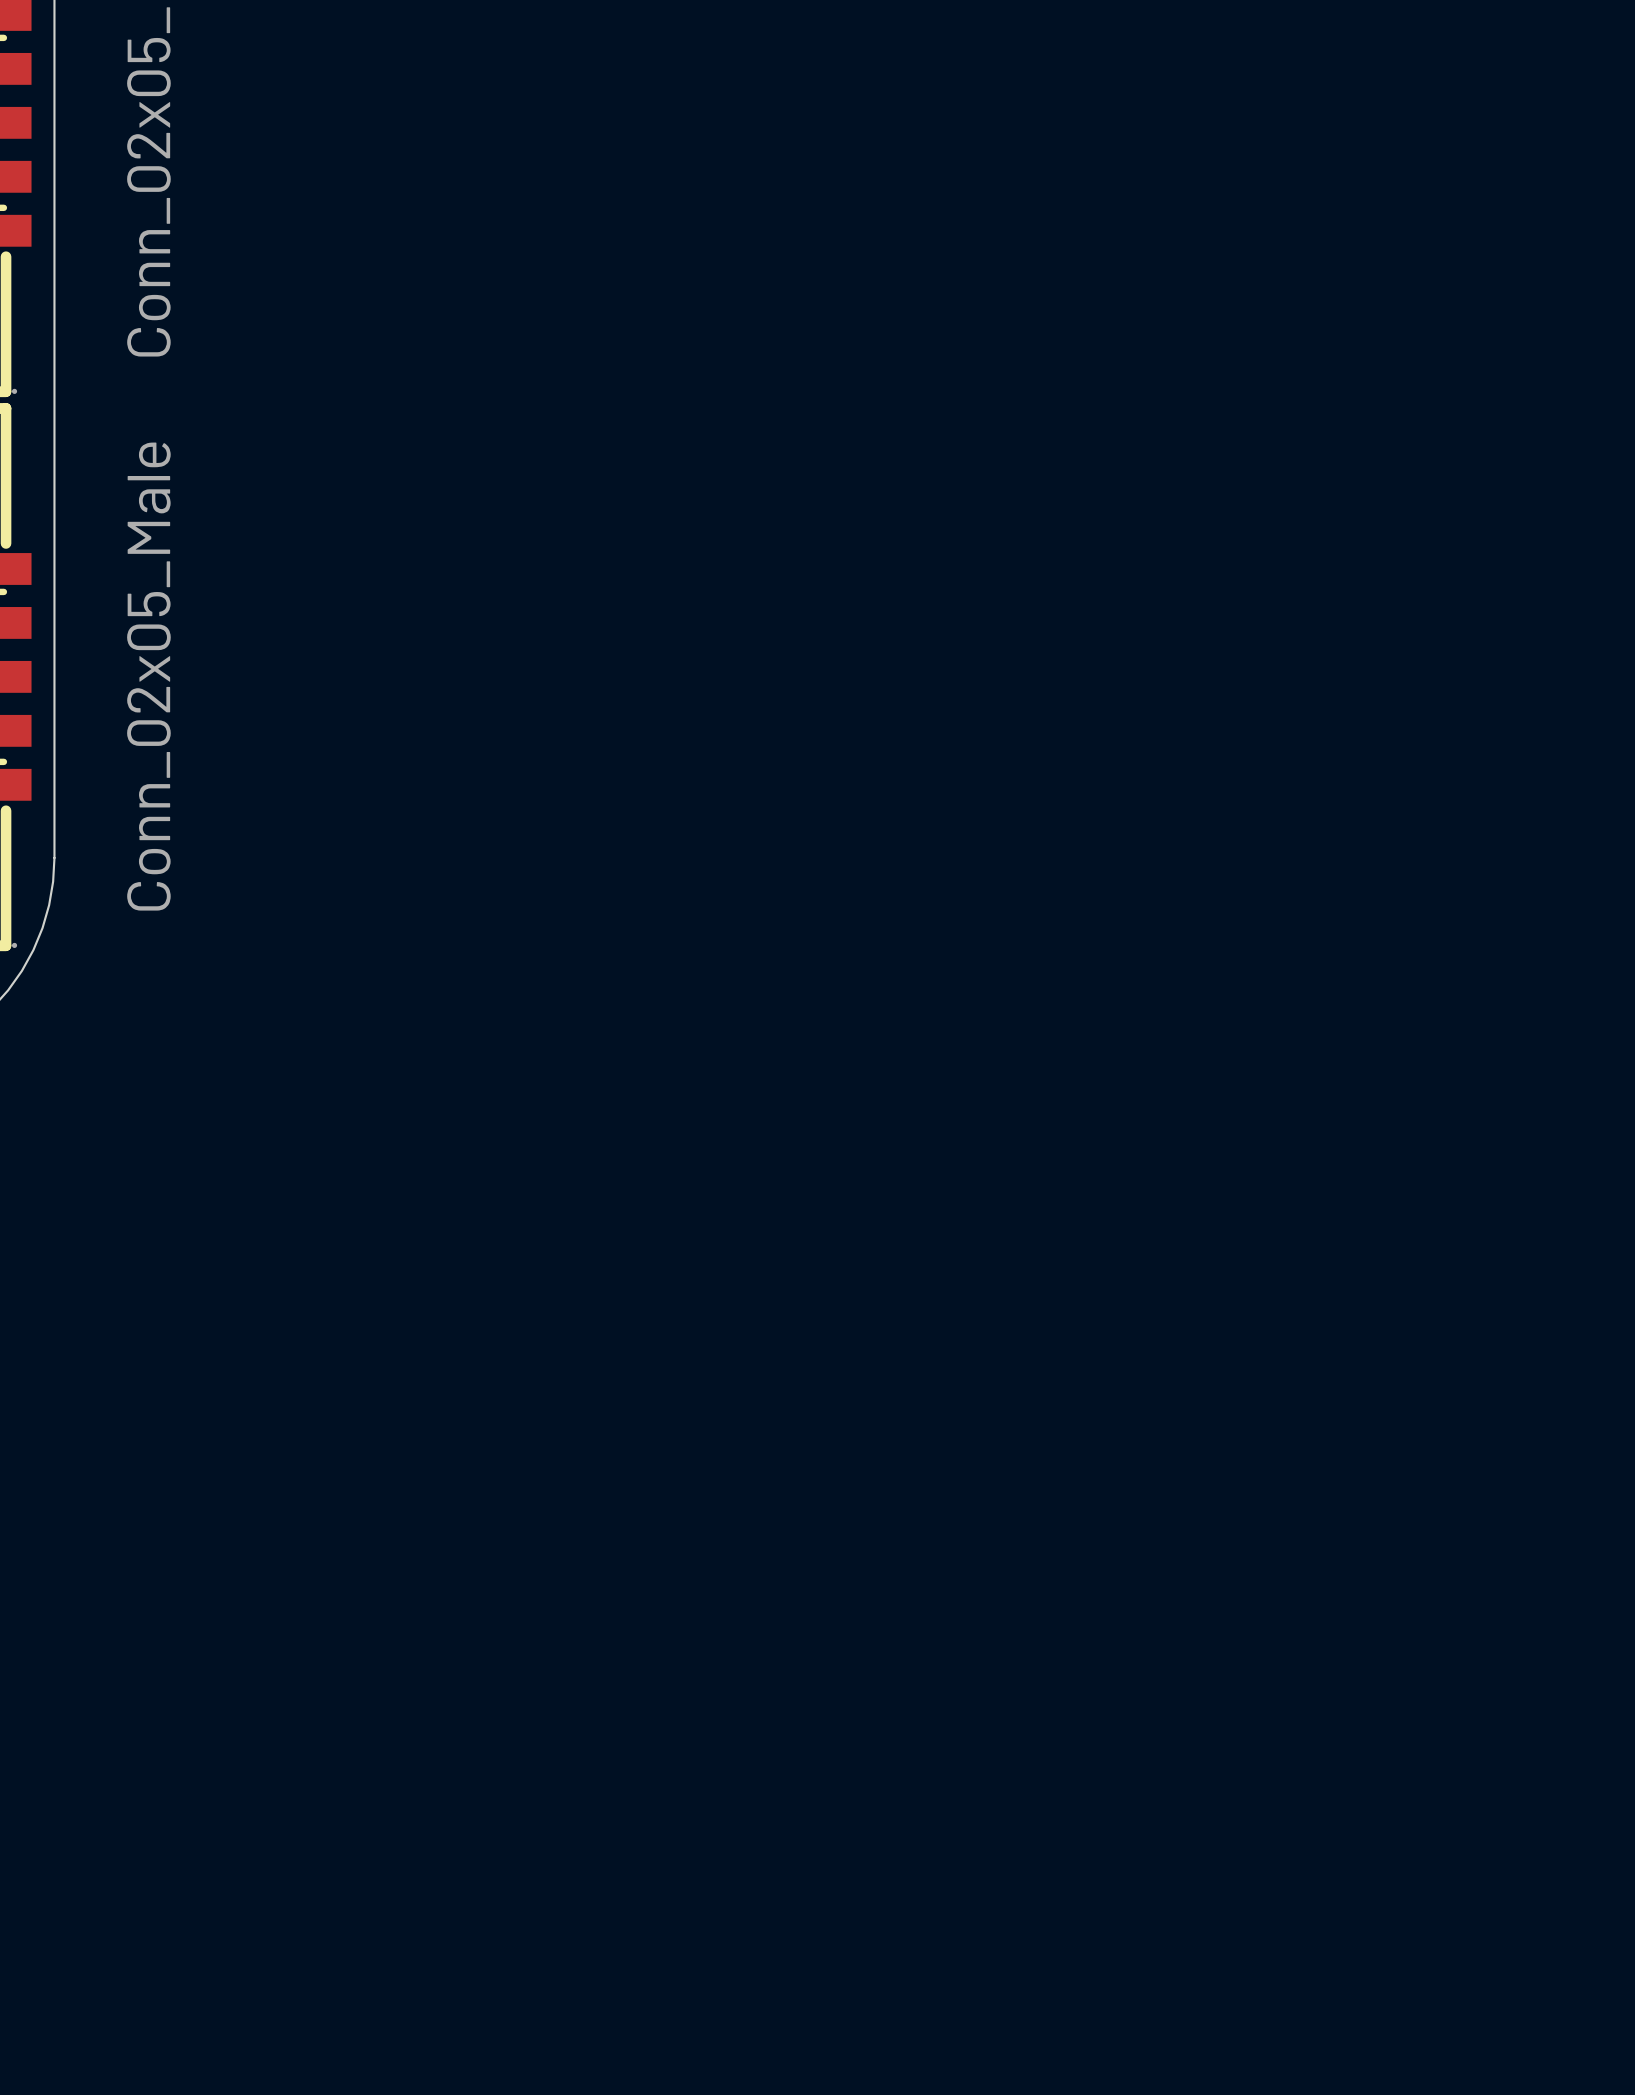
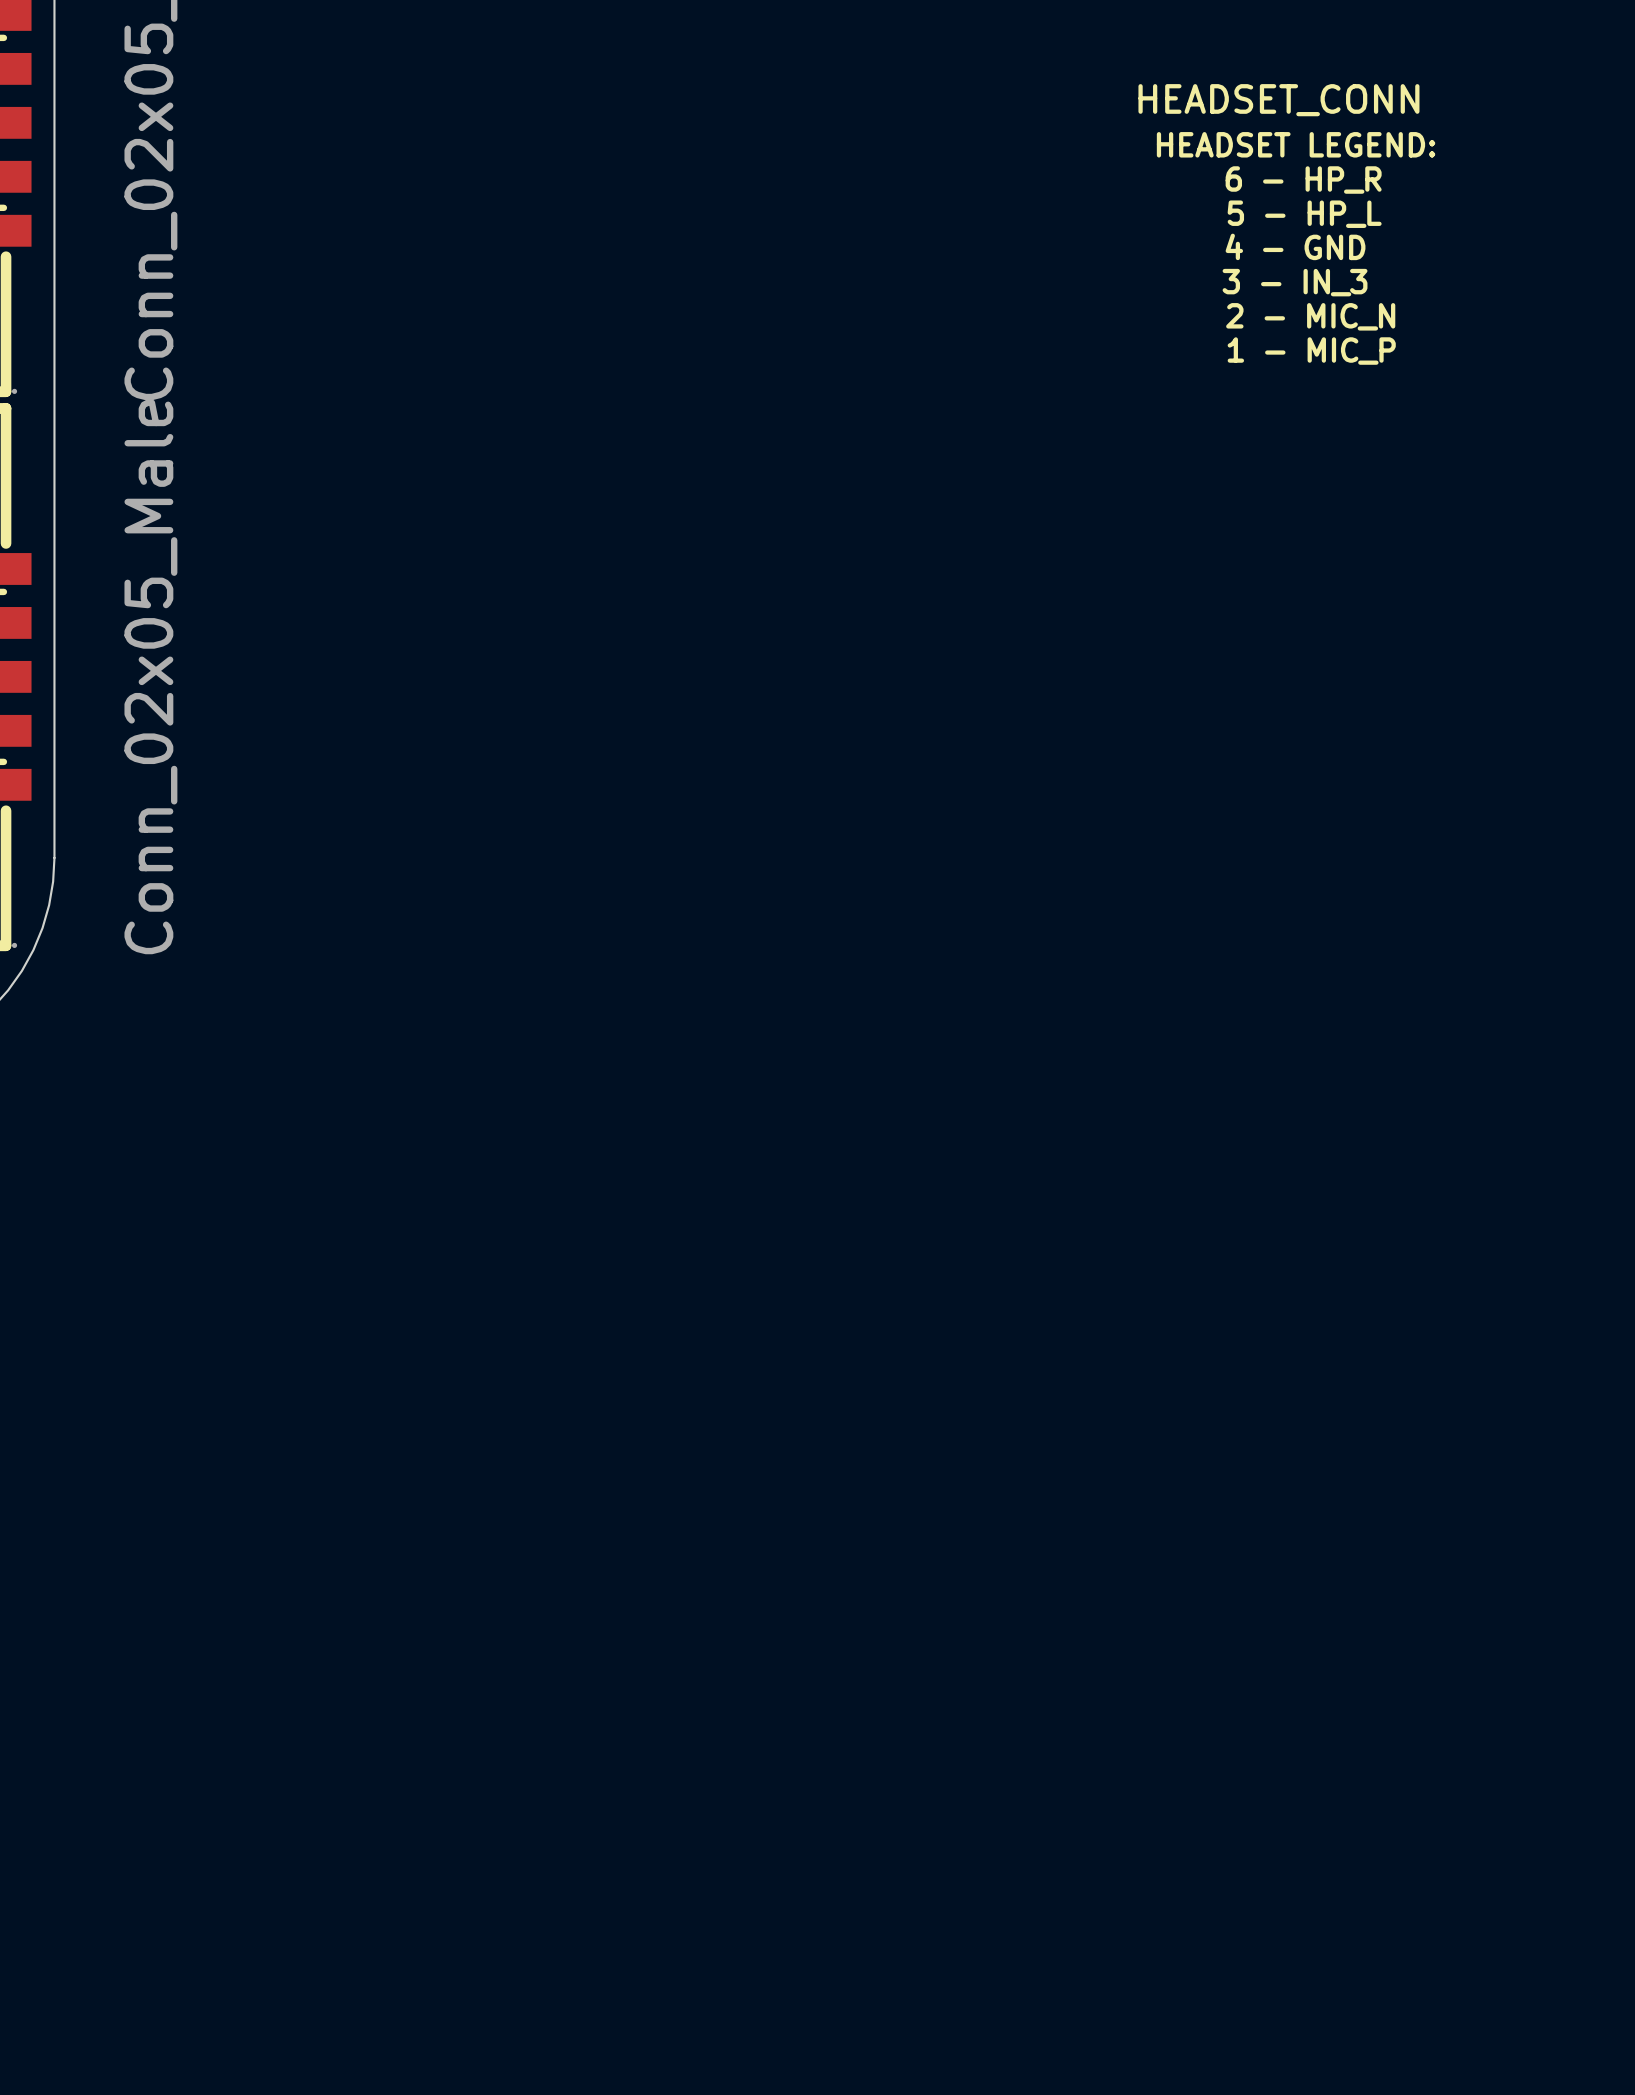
text: none -> HEADSET_CONN (1278, 100)
text: none -> HEADSET LEGEND: (1296, 144)
text: none -> 6 - HP_R (1303, 180)
text: none -> 5 - HP_L (1304, 214)
text: none -> 4 - GND (1295, 246)
text: none -> 3 - IN_3 (1295, 282)
text: none -> 2 - MIC_N (1310, 316)
text: none -> 1 - MIC_P (1311, 351)

